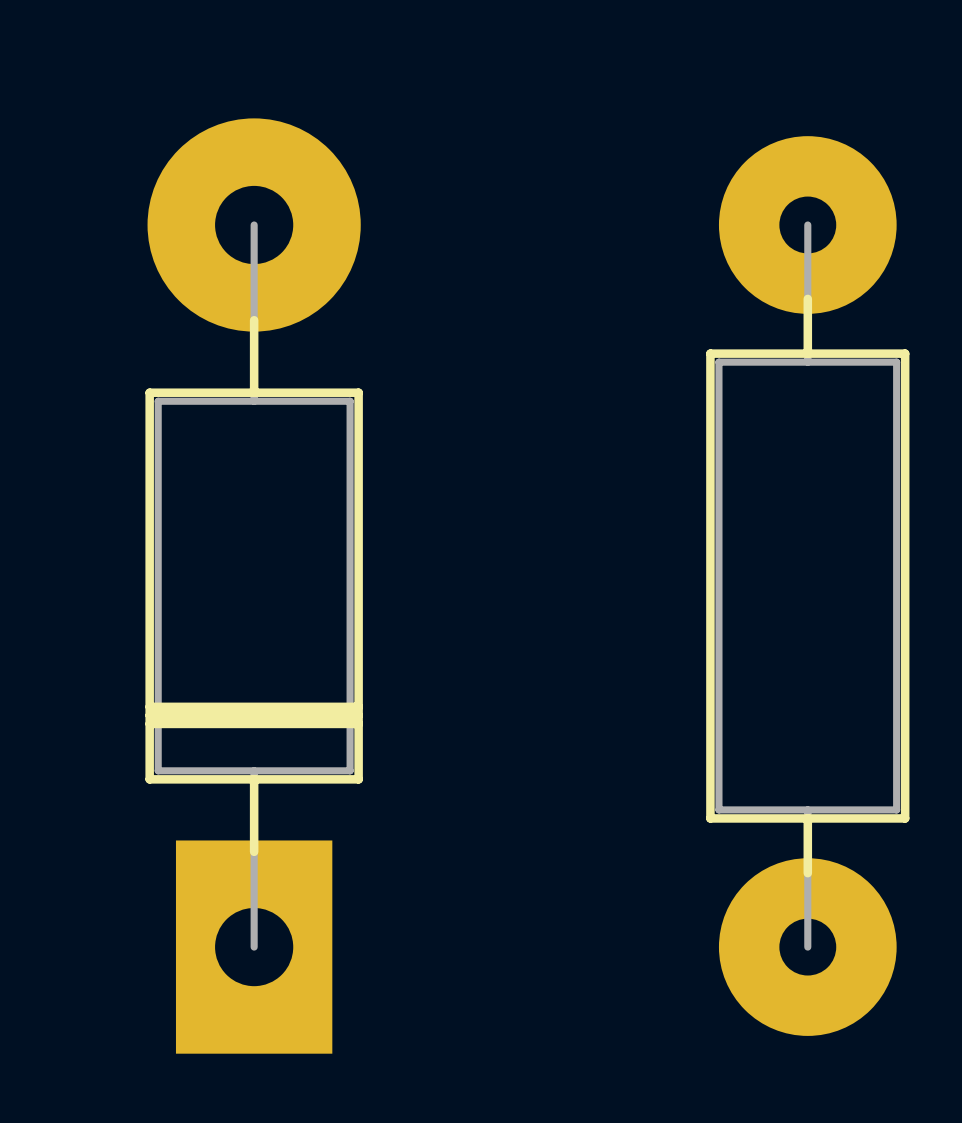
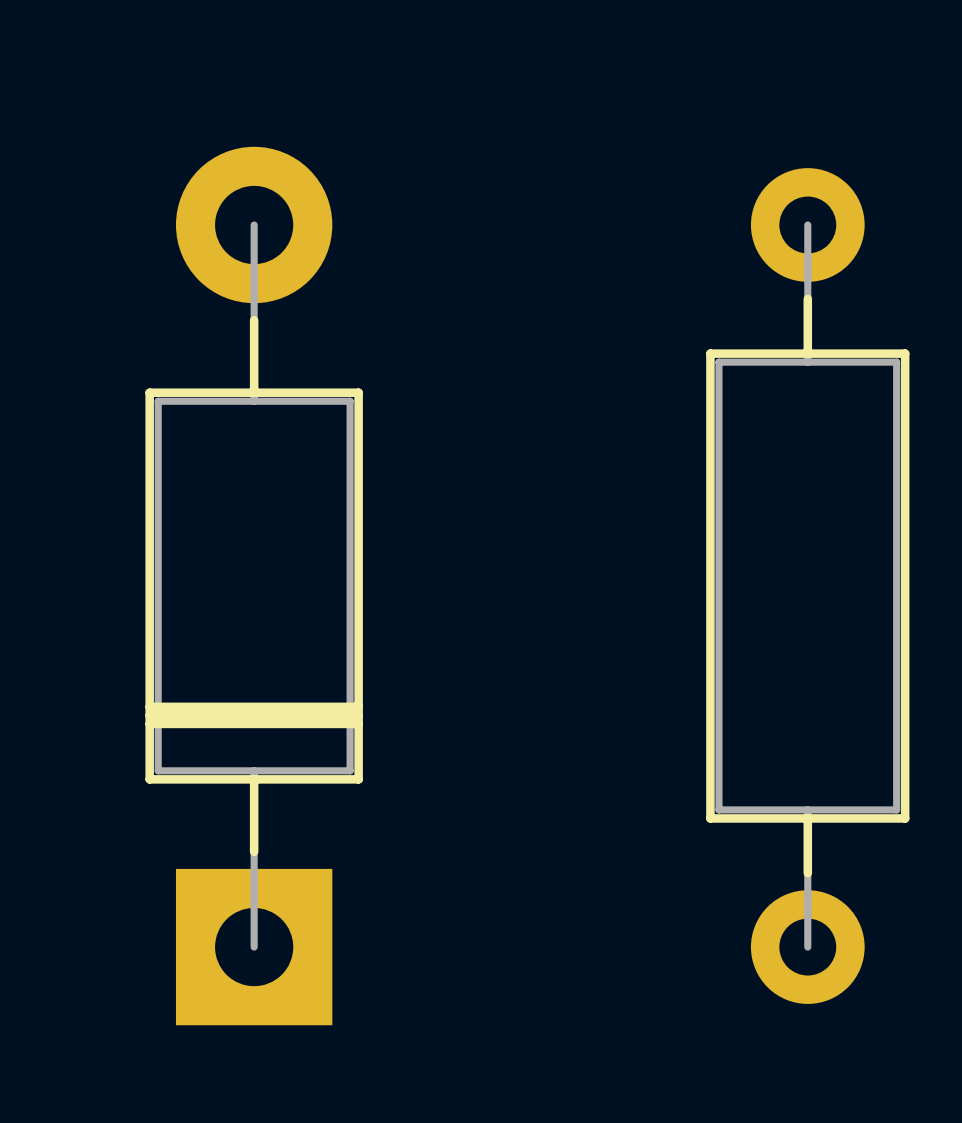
part footprint: [145, 118, 363, 1054] -> [145, 146, 363, 1026]
part footprint: [706, 136, 910, 1036] -> [706, 168, 910, 1004]

